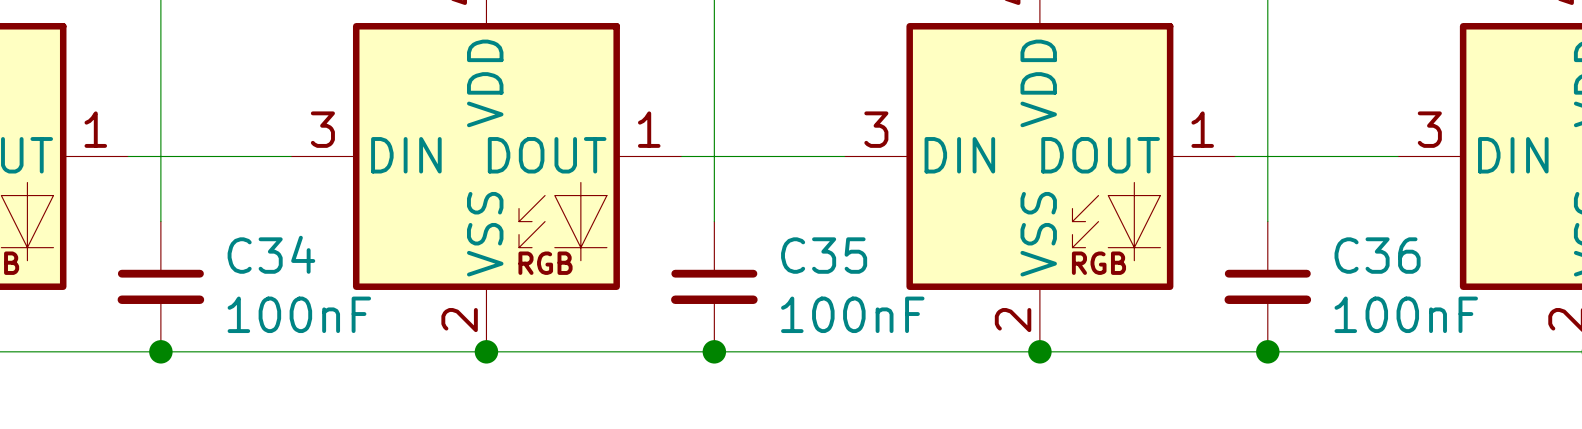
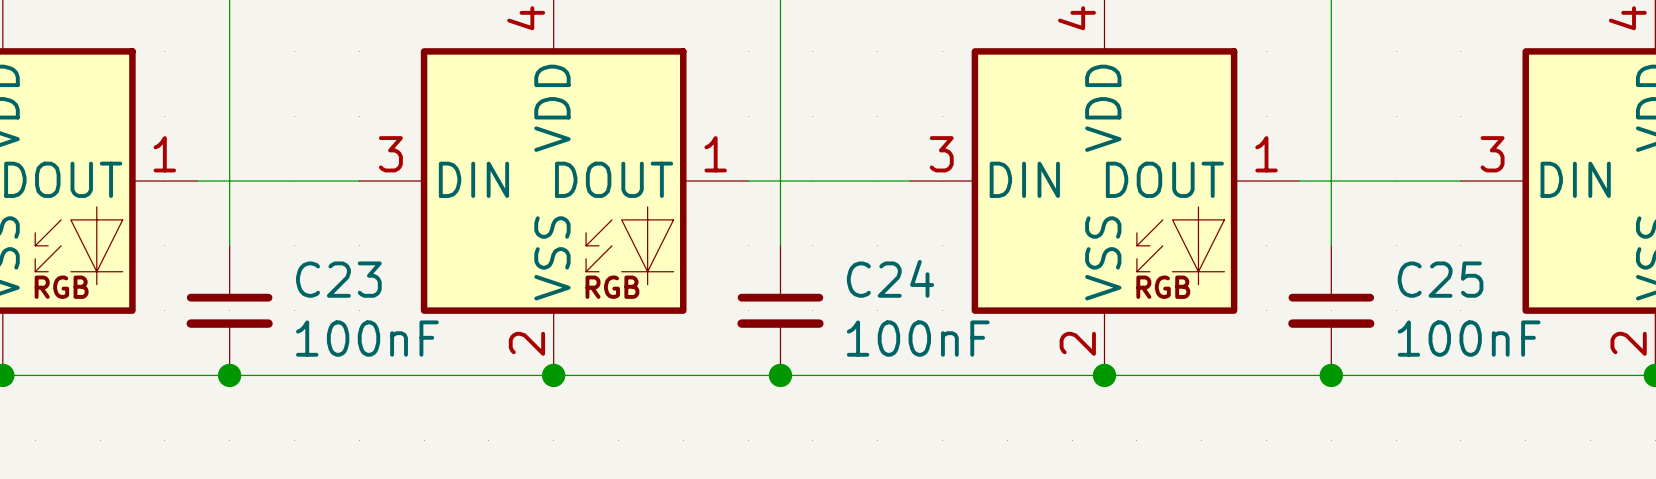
C34 name: C34 (271, 254) -> C23 (338, 279)
C35 name: C35 (824, 255) -> C24 (890, 278)
C36 name: C36 (1377, 255) -> C25 (1440, 279)

